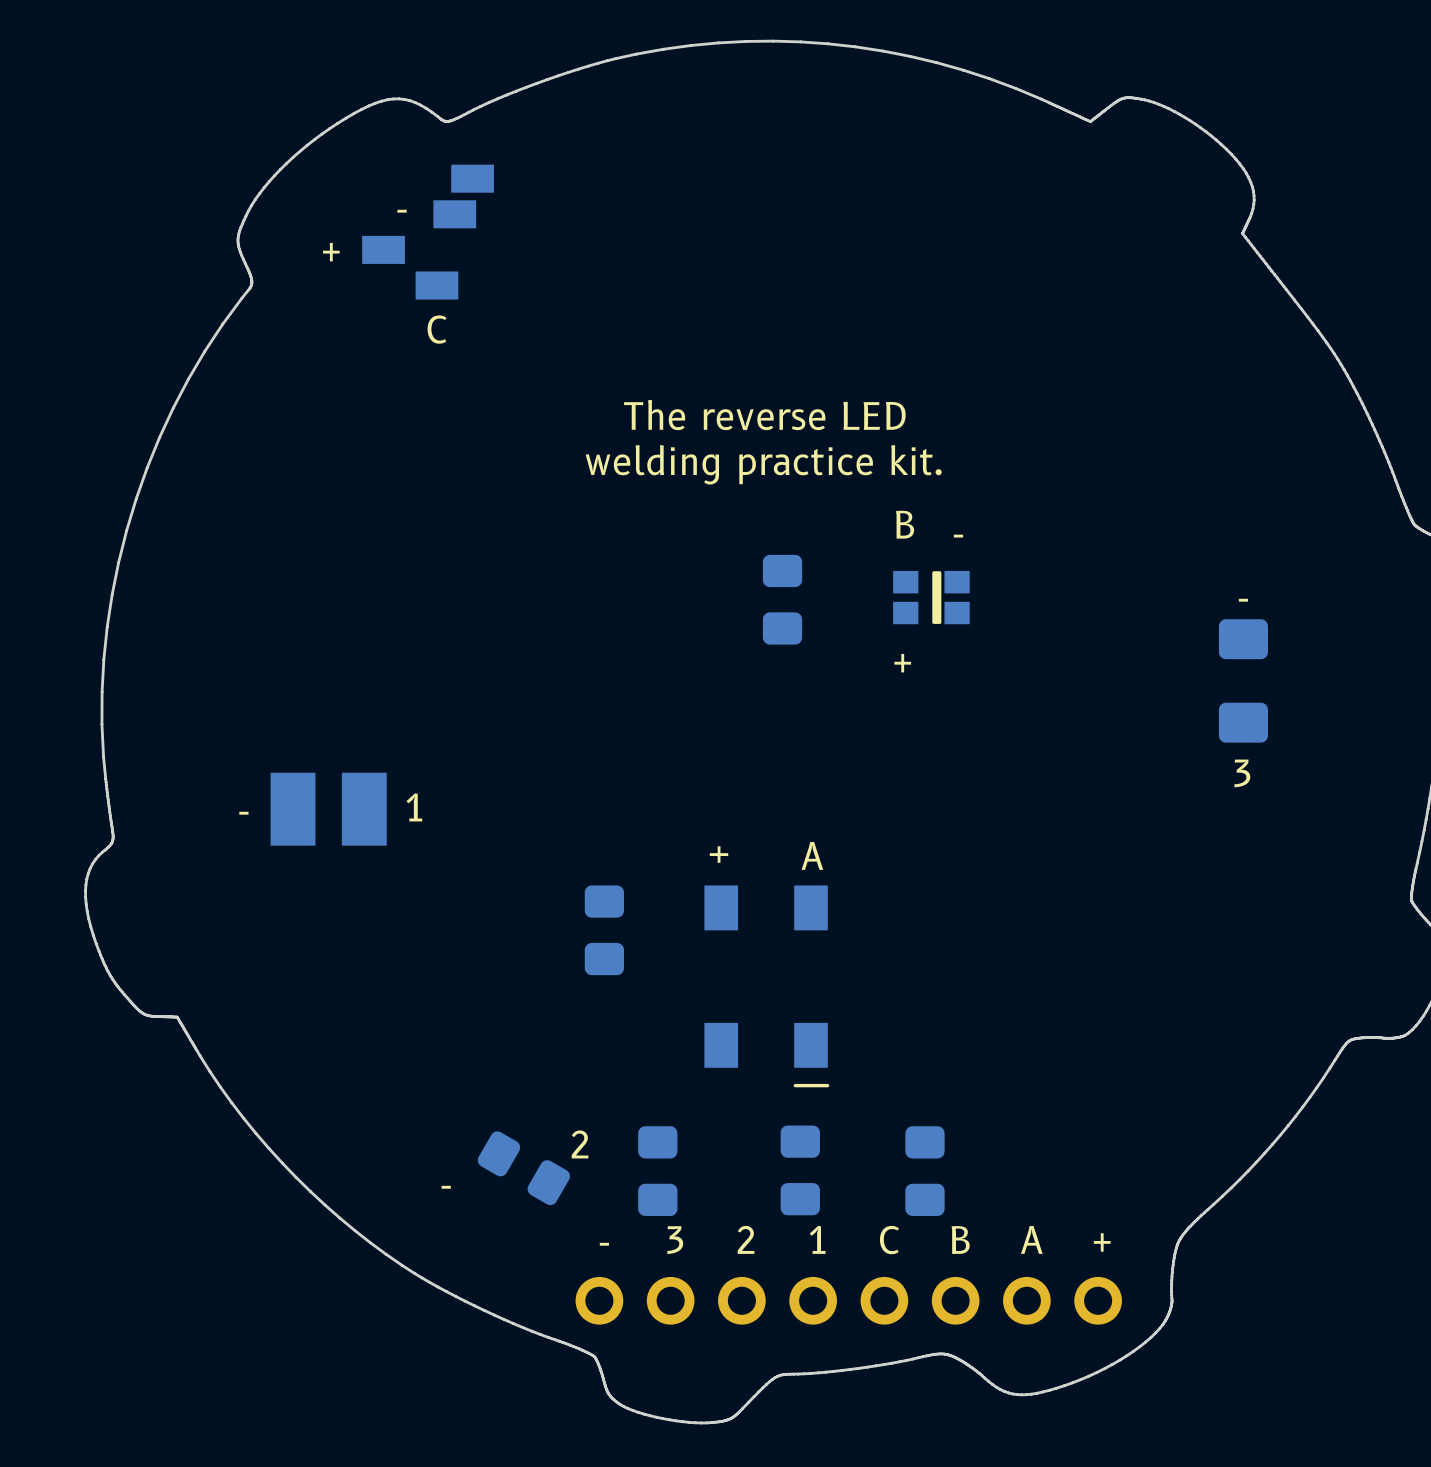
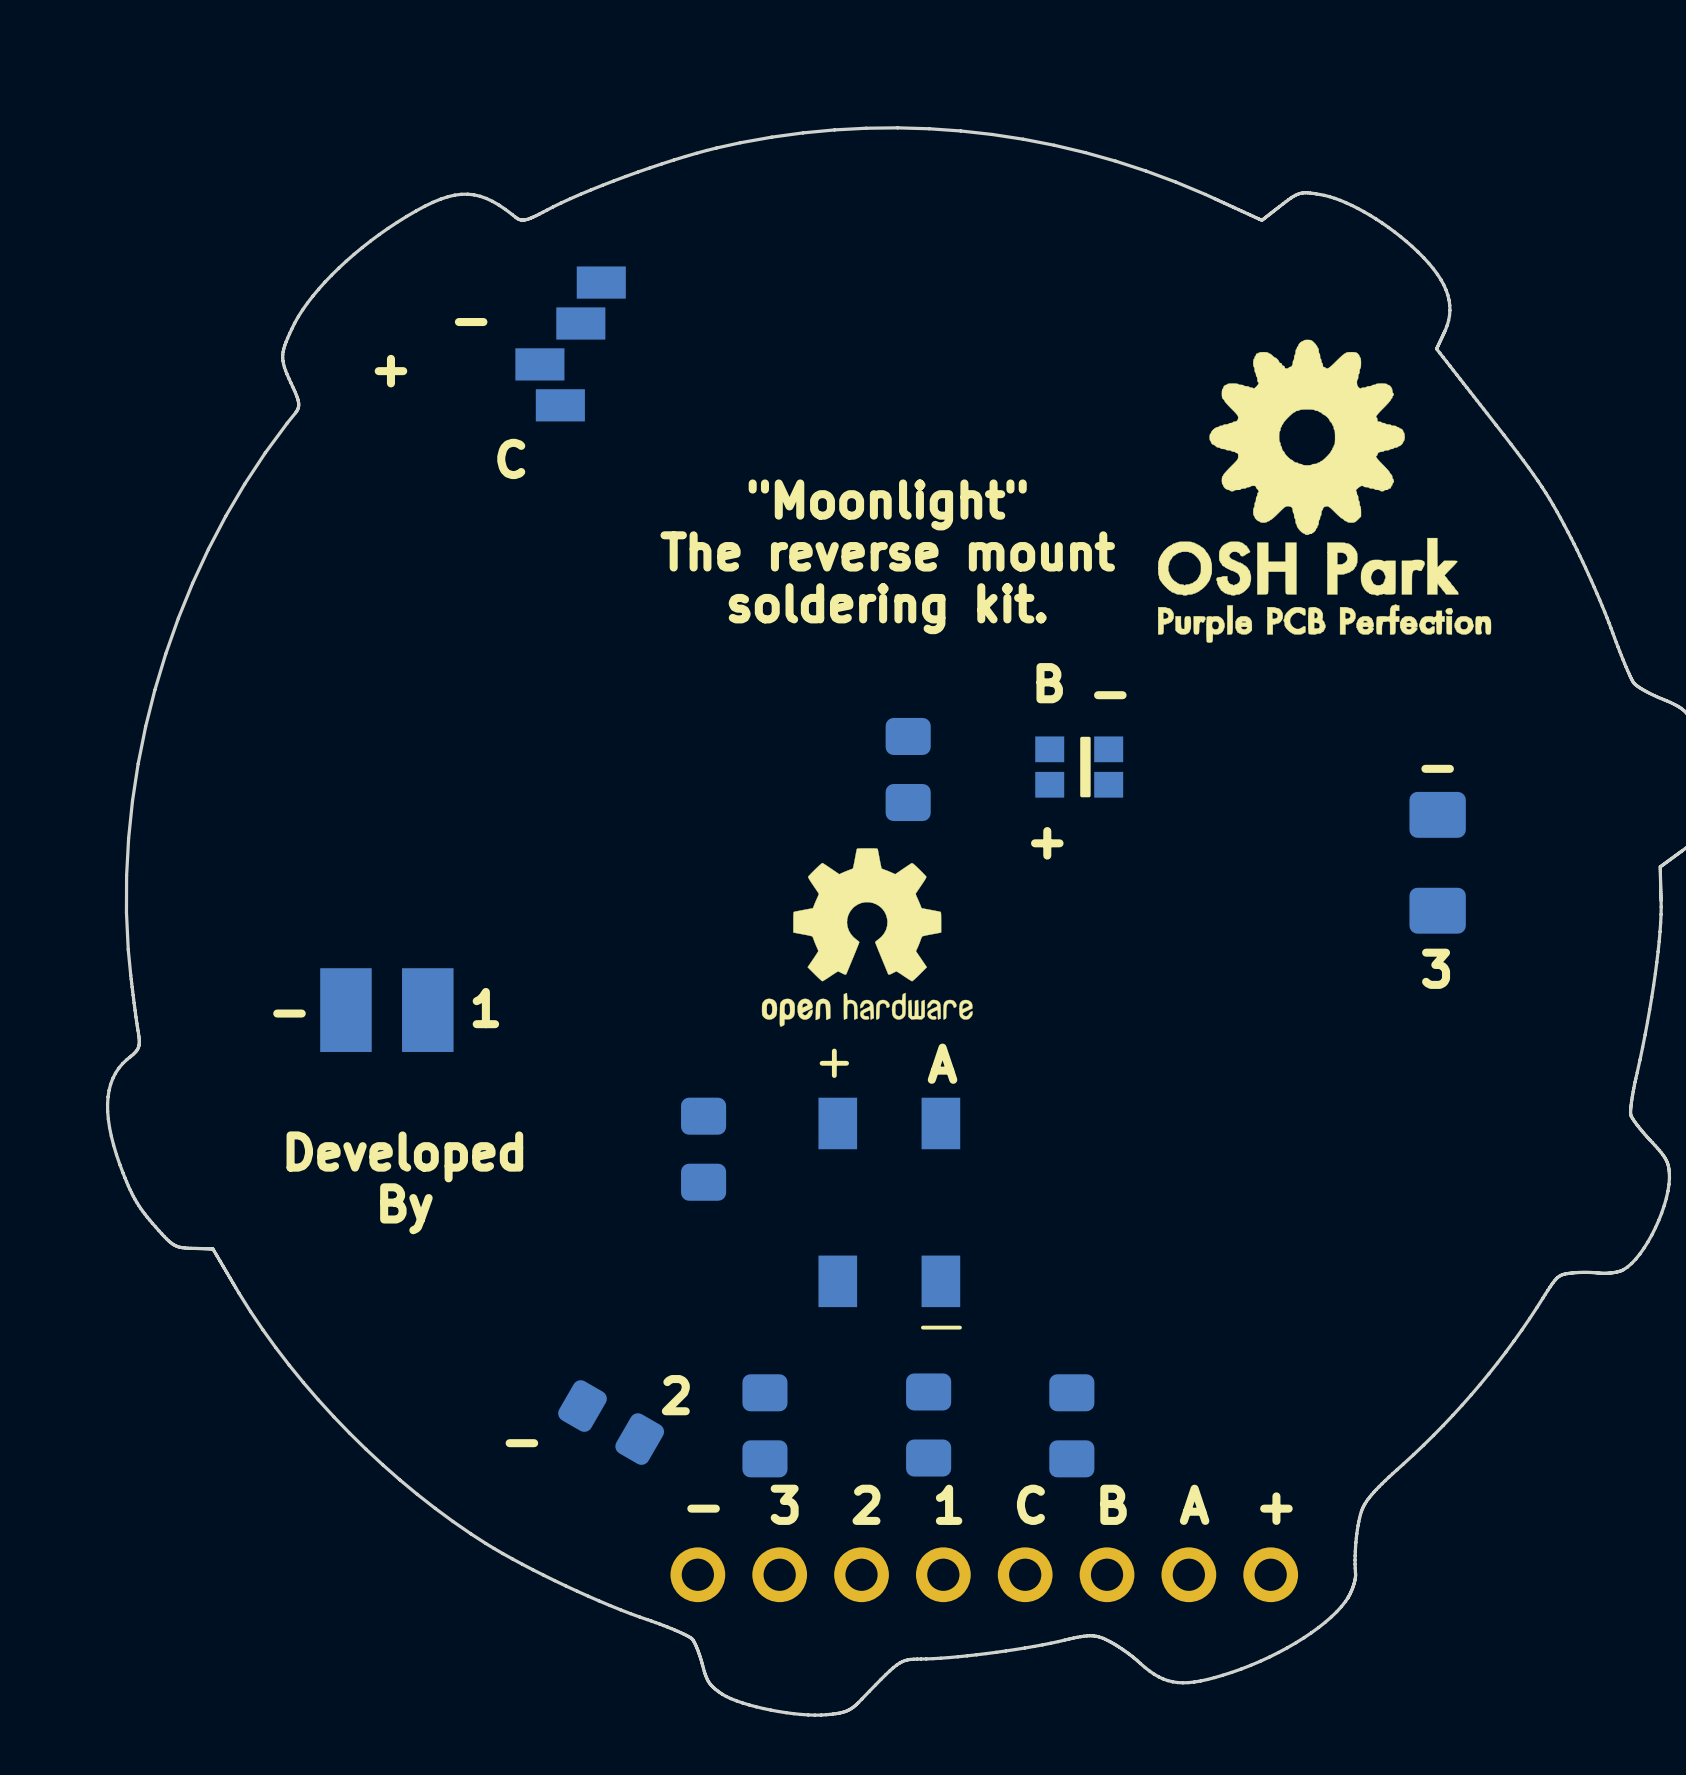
drawing: none -> [1158, 339, 1492, 643]
part: none -> (570, 343)
part: (428, 232) -> none
text: none -> "Moonlight" (887, 504)
text: The reverse LED (764, 415) -> The reverse mount (887, 551)
text: welding practice kit. (763, 464) -> soldering kit. (887, 608)
drawing: none -> [761, 848, 973, 1027]
text: none -> Developed (404, 1156)
text: none -> By (406, 1208)

